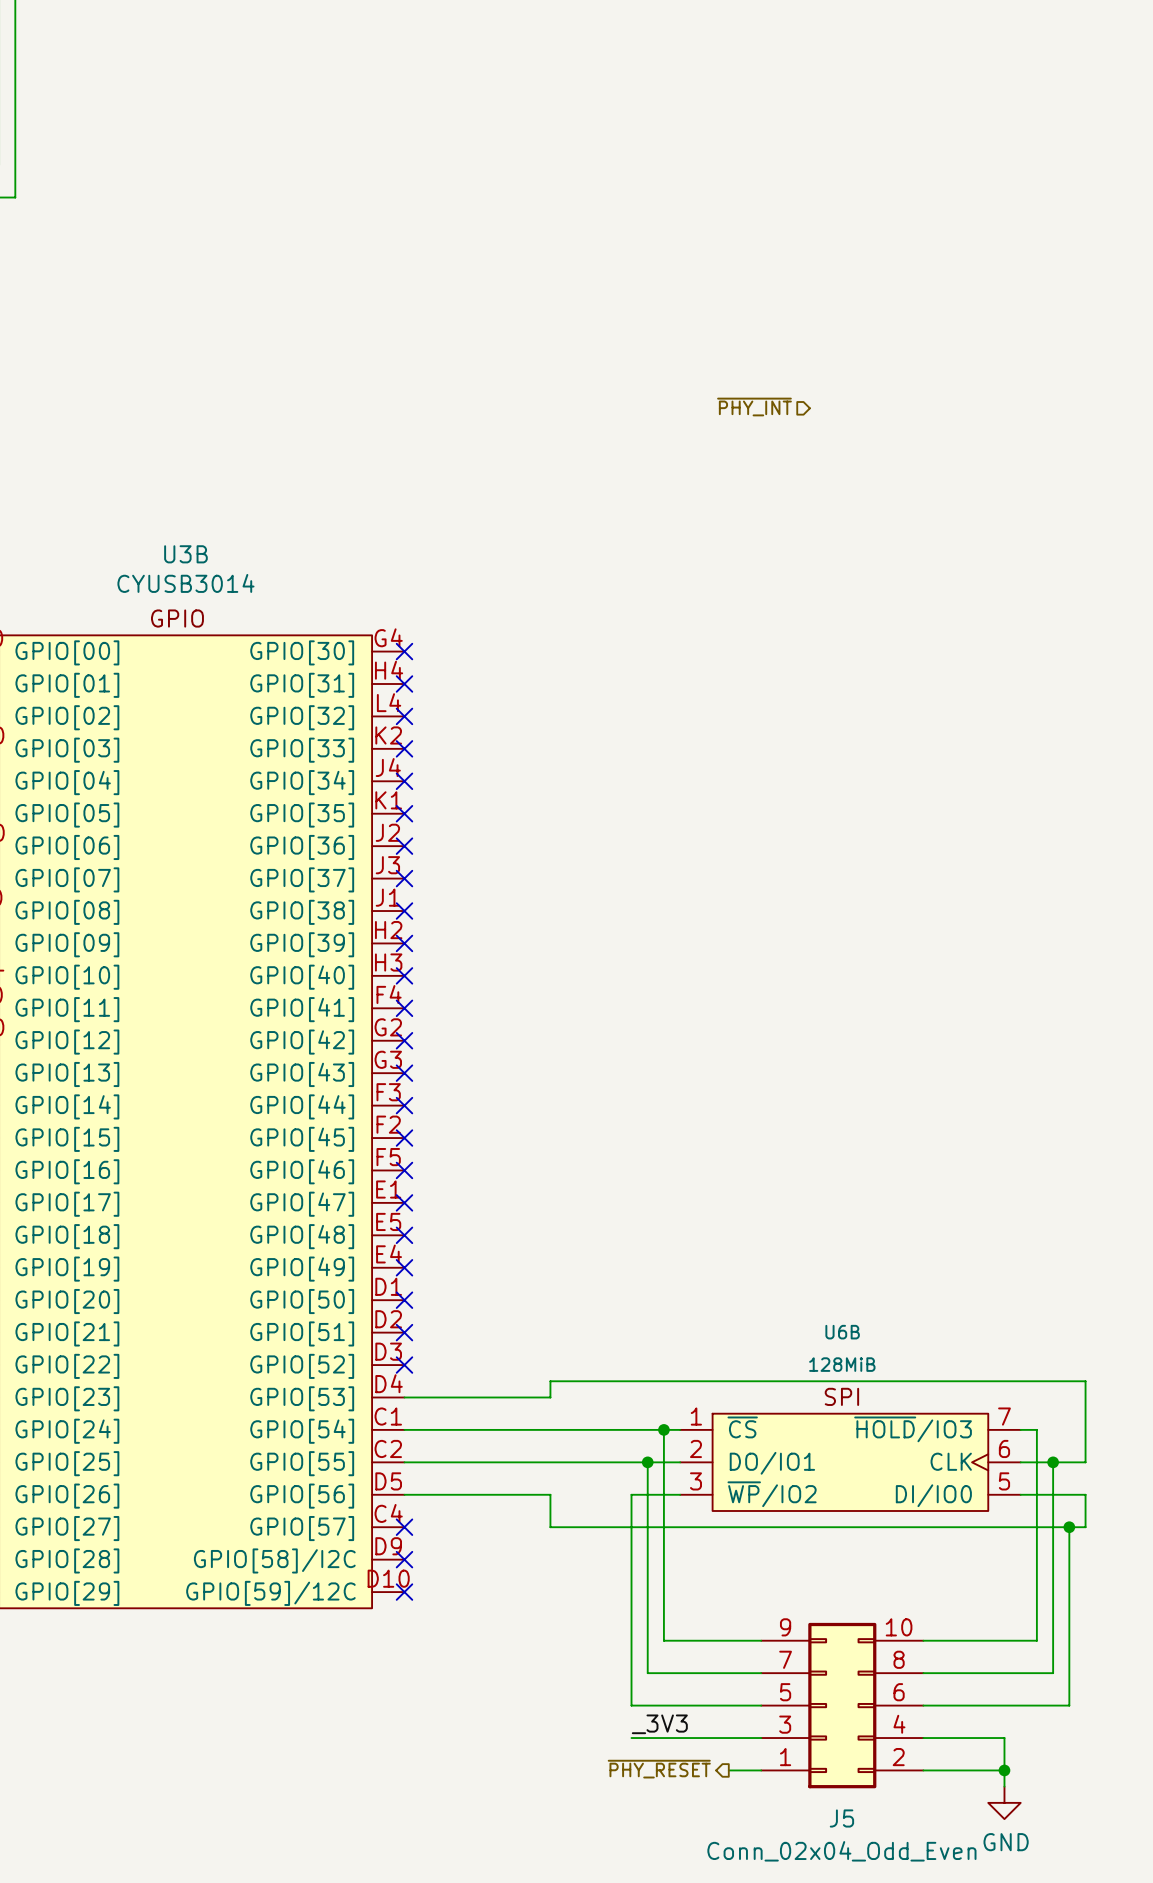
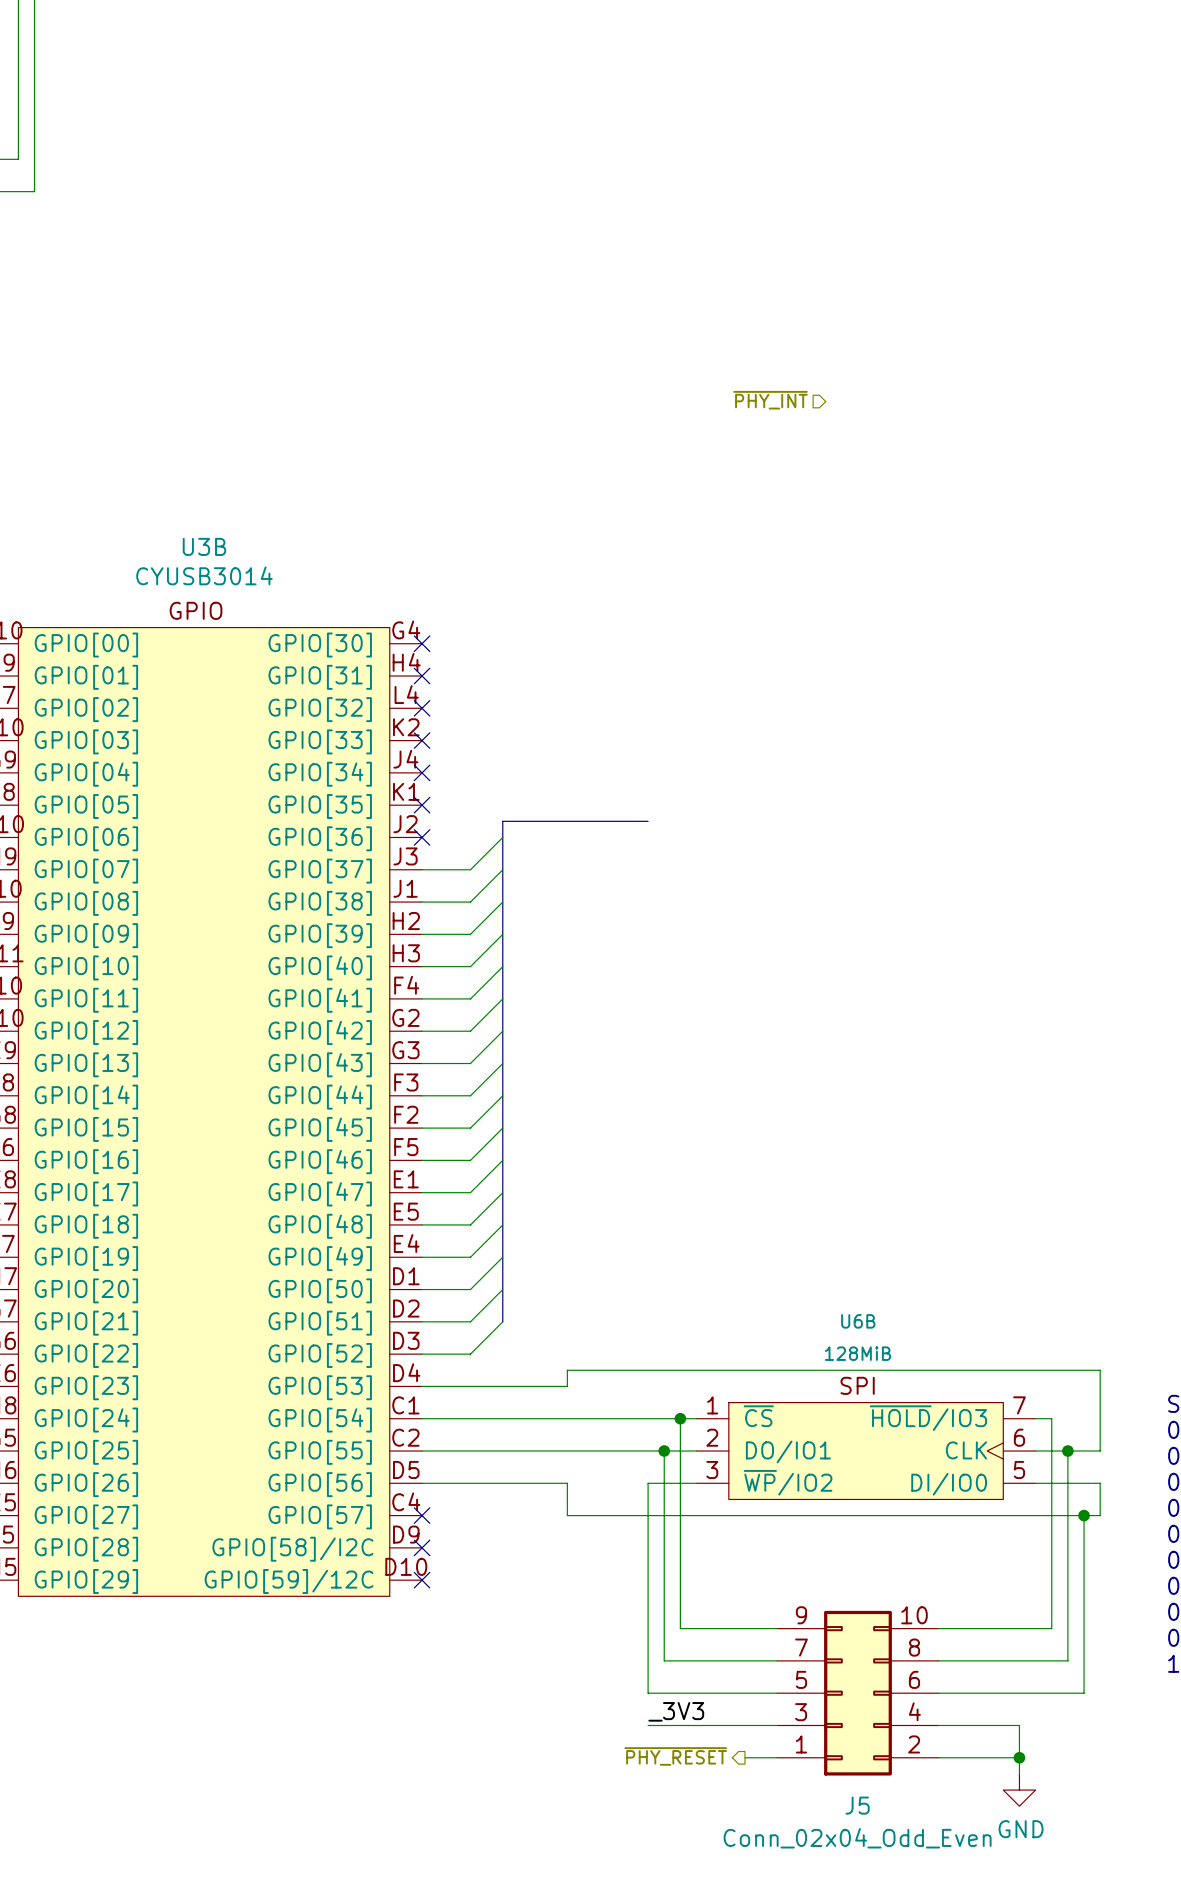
bus: none -> (648, 821) (502, 821) (502, 1321)
wire: none -> (502, 837) (470, 869) (422, 869)
no-connect mark: (404, 878) -> none
wire: none -> (502, 869) (470, 902) (422, 902)
no-connect mark: (404, 911) -> none
wire: none -> (502, 902) (470, 934) (422, 934)
no-connect mark: (404, 943) -> none
wire: none -> (502, 934) (470, 966) (422, 966)
no-connect mark: (404, 975) -> none
wire: none -> (502, 966) (470, 998) (422, 998)
no-connect mark: (404, 1008) -> none
wire: none -> (502, 998) (470, 1031) (422, 1031)
no-connect mark: (404, 1040) -> none
wire: none -> (502, 1031) (470, 1063) (422, 1063)
no-connect mark: (404, 1073) -> none
wire: none -> (502, 1063) (470, 1095) (422, 1095)
no-connect mark: (404, 1105) -> none
wire: none -> (502, 1095) (470, 1128) (422, 1128)
no-connect mark: (404, 1138) -> none
wire: none -> (502, 1128) (470, 1160) (422, 1160)
no-connect mark: (404, 1170) -> none
wire: none -> (502, 1160) (470, 1192) (422, 1192)
no-connect mark: (404, 1202) -> none
wire: none -> (502, 1192) (470, 1224) (422, 1224)
no-connect mark: (404, 1235) -> none
wire: none -> (502, 1224) (470, 1257) (422, 1257)
no-connect mark: (404, 1267) -> none
wire: none -> (502, 1257) (470, 1289) (422, 1289)
no-connect mark: (404, 1300) -> none
wire: none -> (502, 1289) (470, 1321) (422, 1321)
no-connect mark: (404, 1332) -> none
wire: none -> (502, 1321) (470, 1354) (422, 1354)
no-connect mark: (404, 1365) -> none

